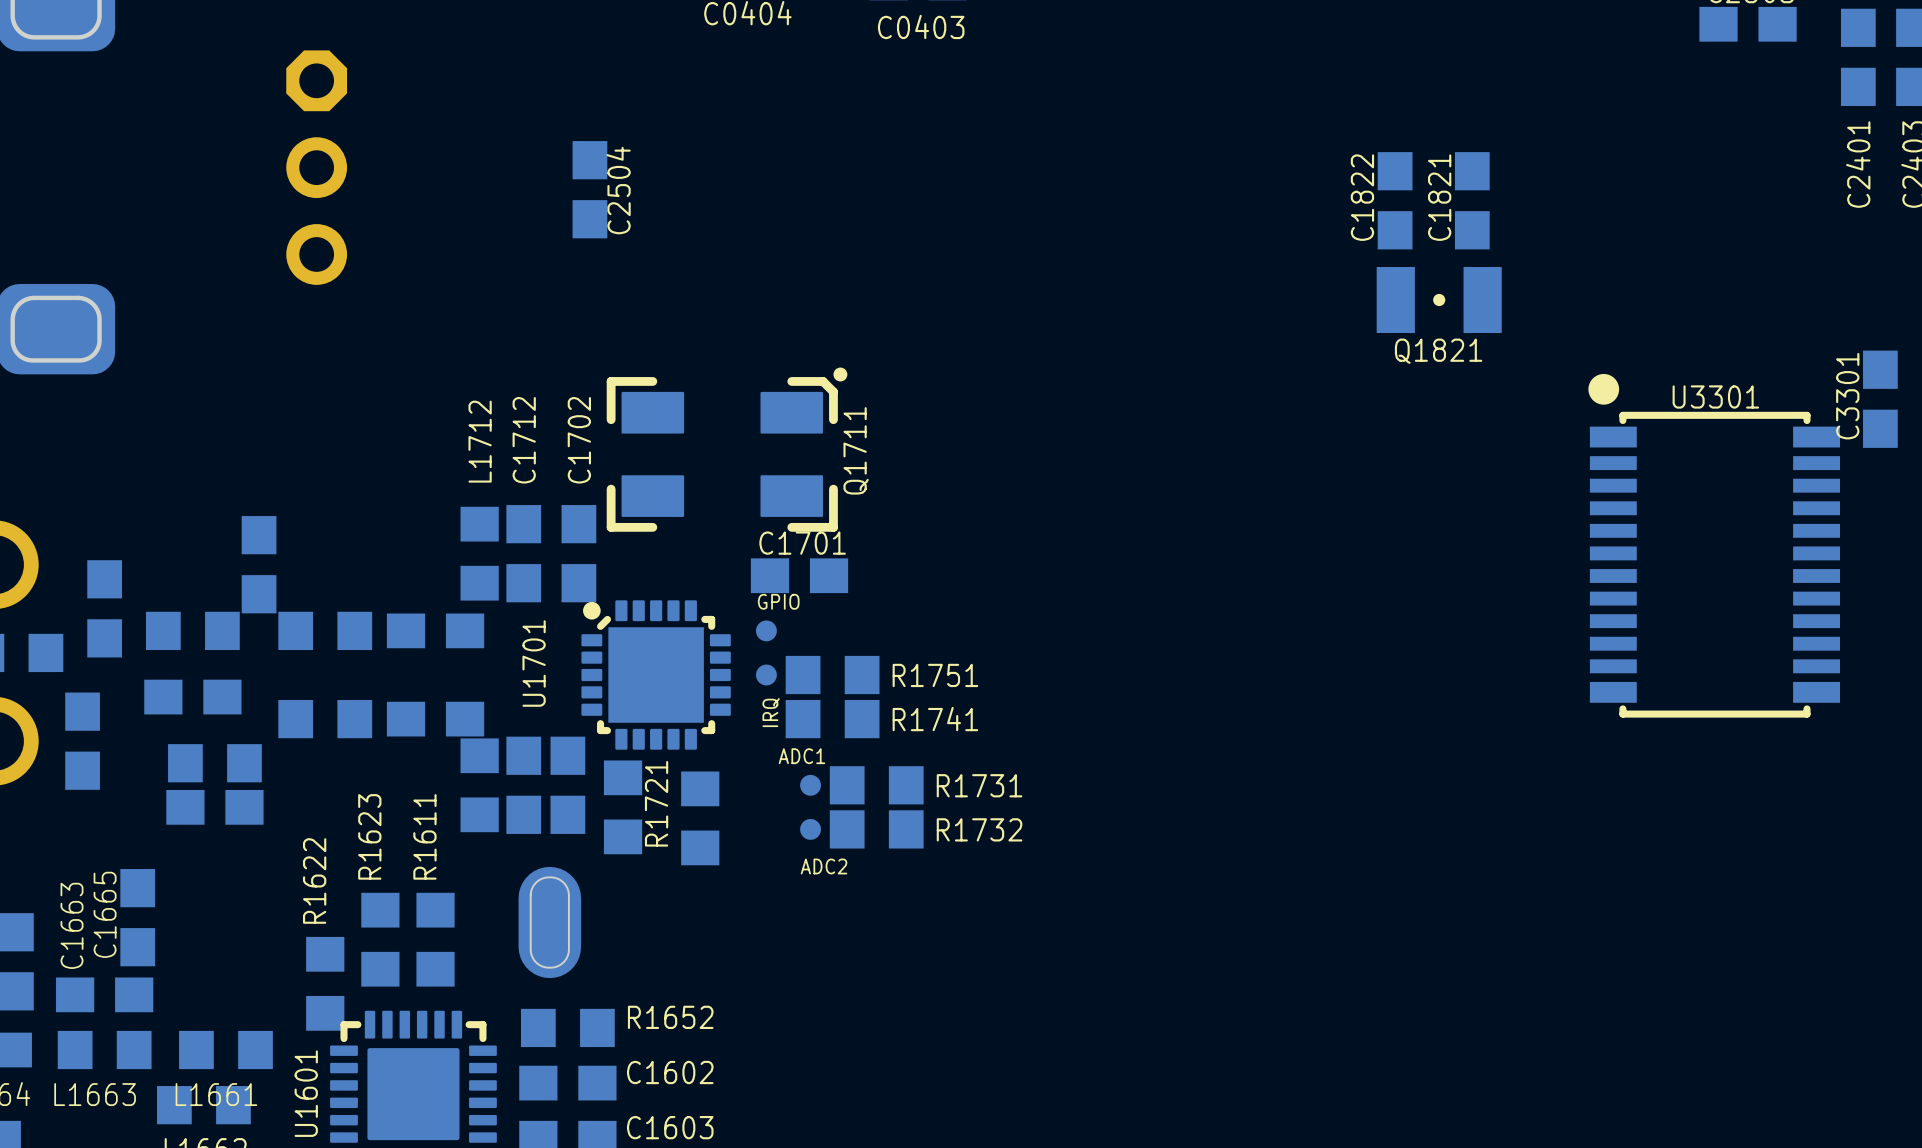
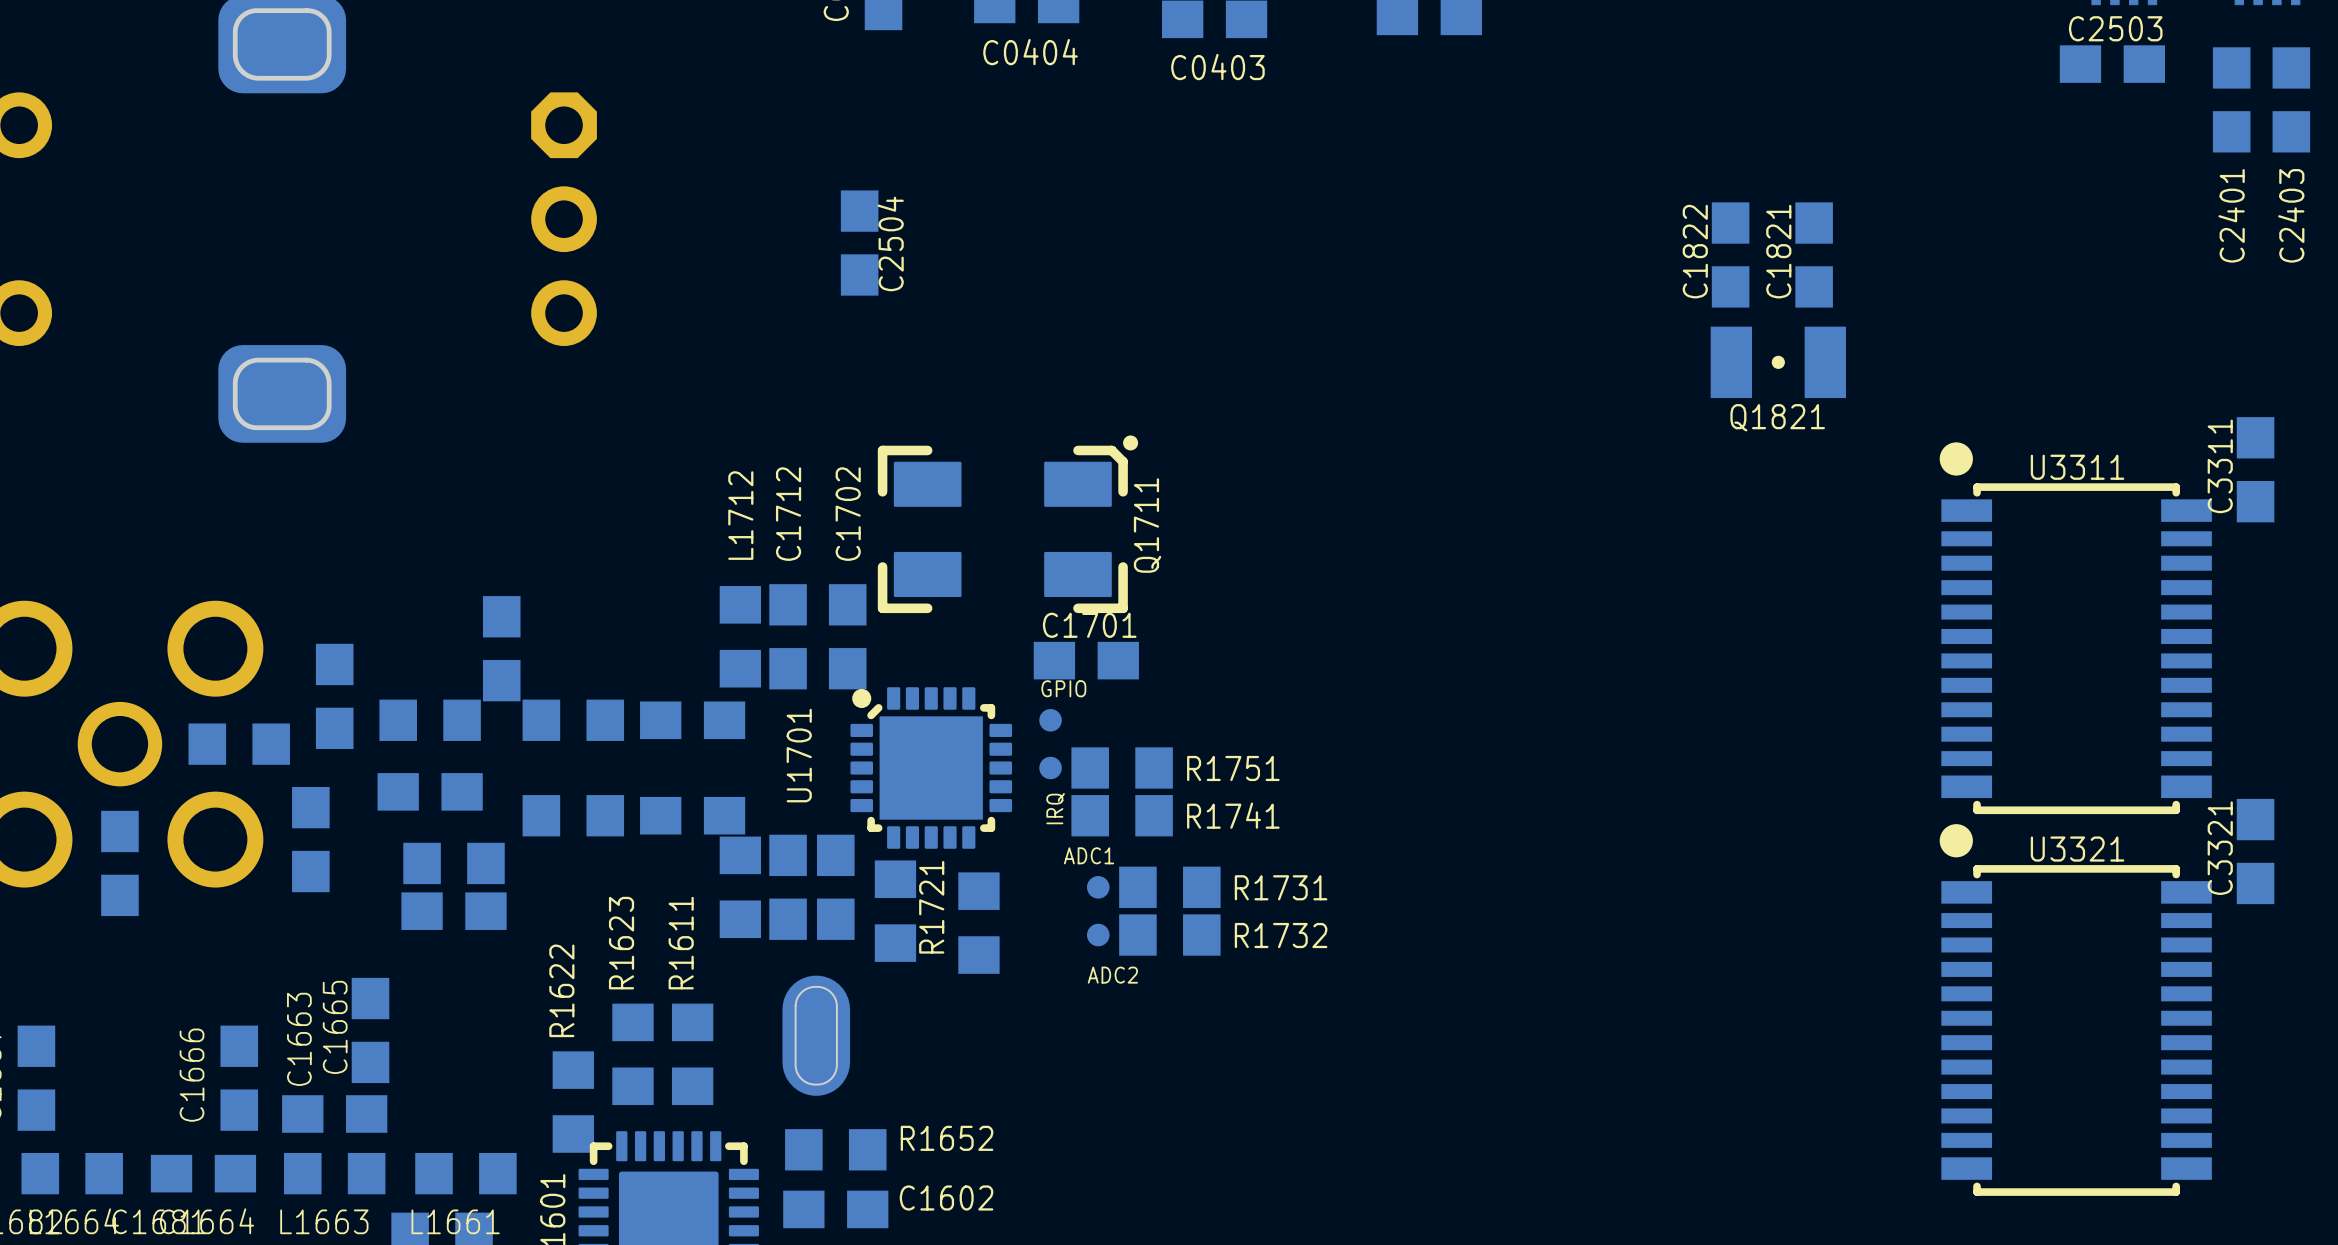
U3301 name: U3301 (1715, 396) -> U3311 (2077, 467)
C3301 name: C3301 (1847, 396) -> C3311 (2220, 466)
C3321: none -> (2255, 851)
U3321: none -> (2075, 1010)

